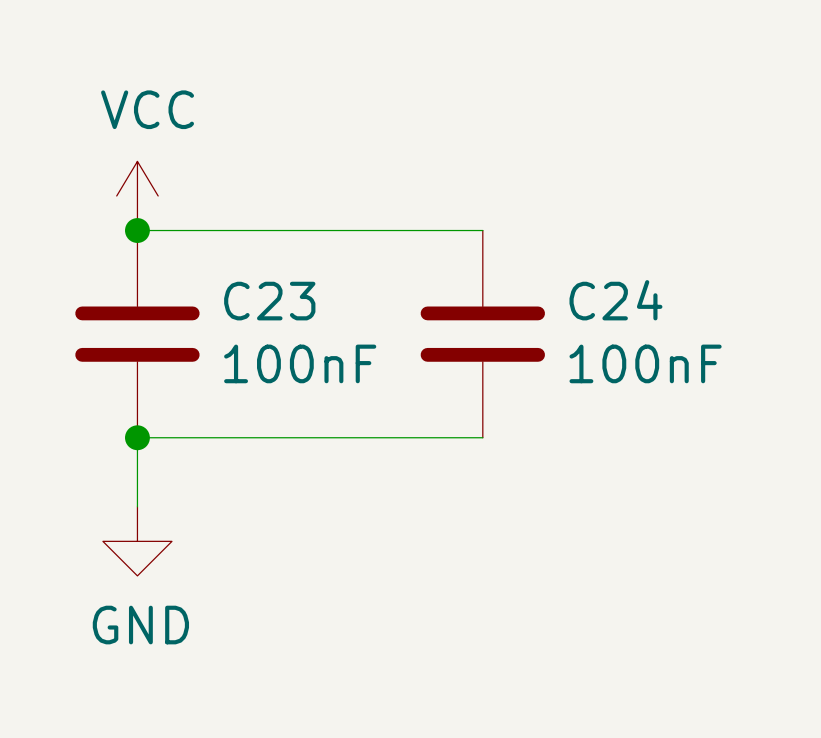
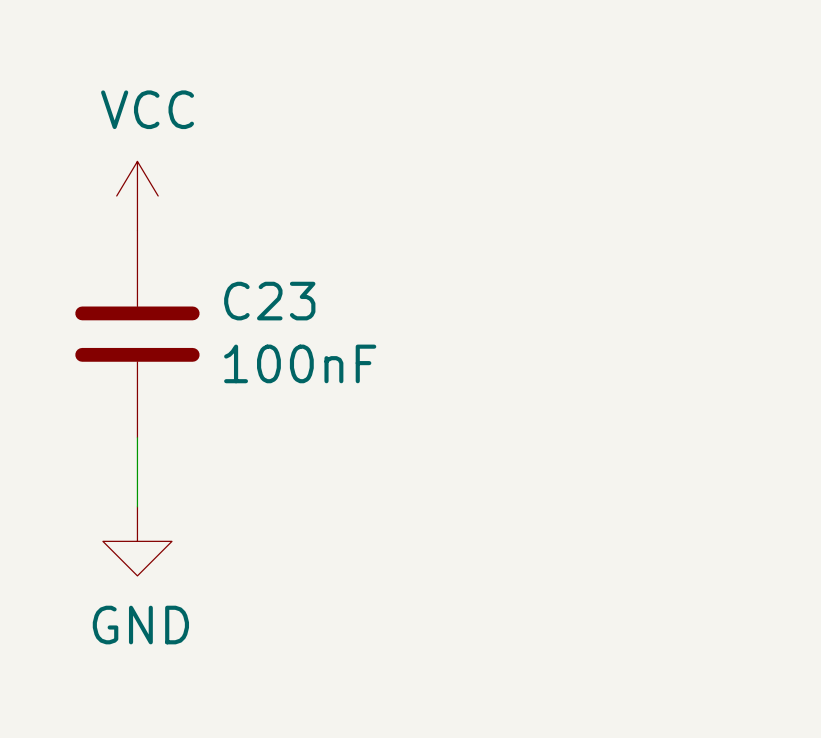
wire: (137, 230) (482, 230) -> none
junction: (137, 230) -> none
C24: 100nF (482, 334) -> none
wire: (137, 437) (482, 437) -> none
junction: (137, 437) -> none

